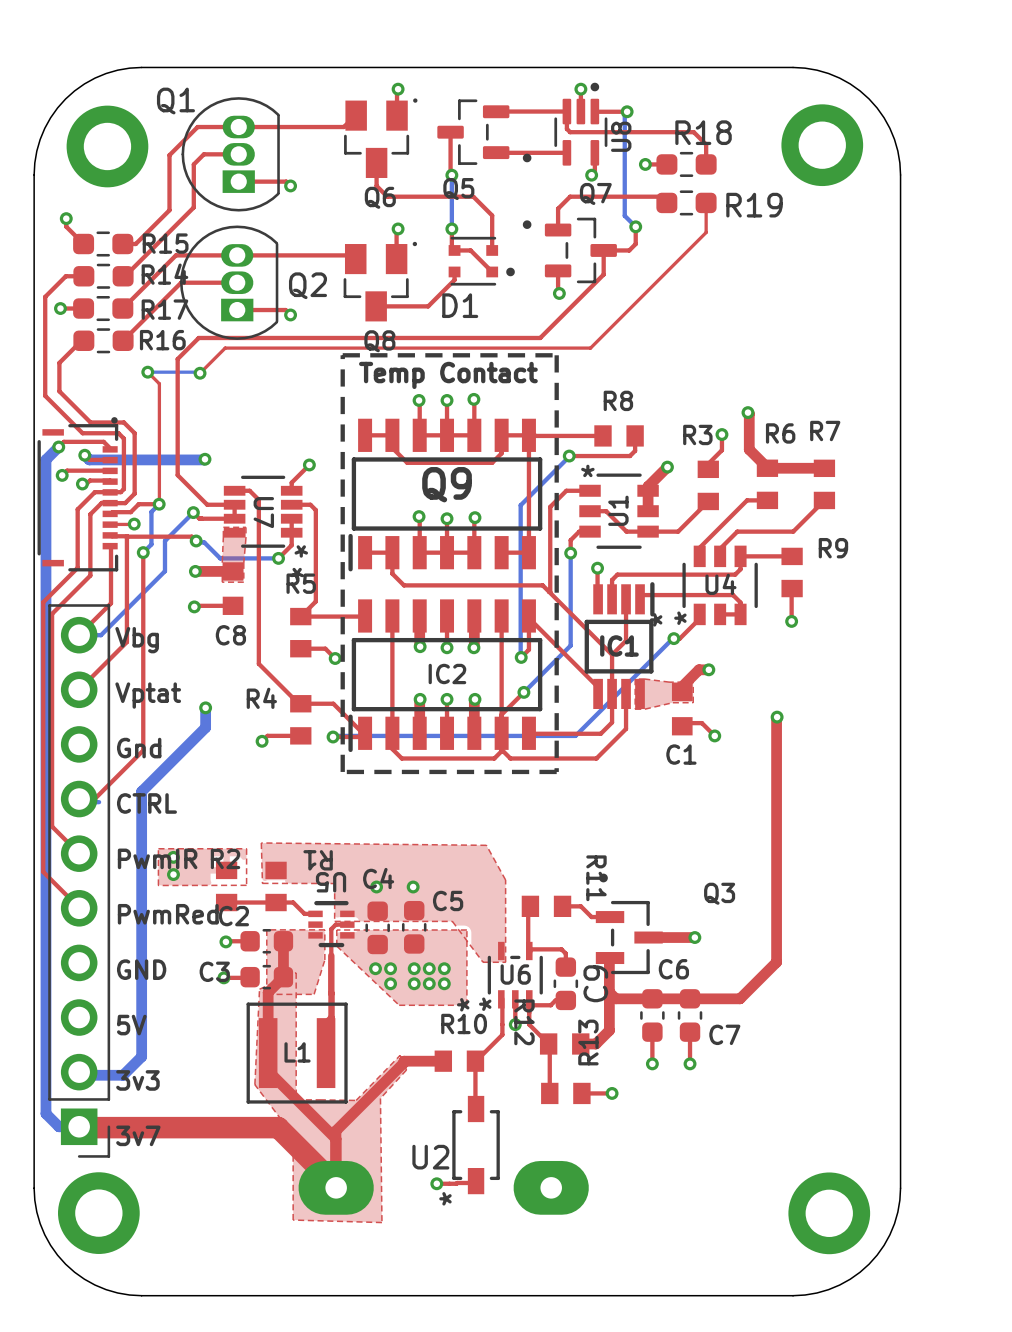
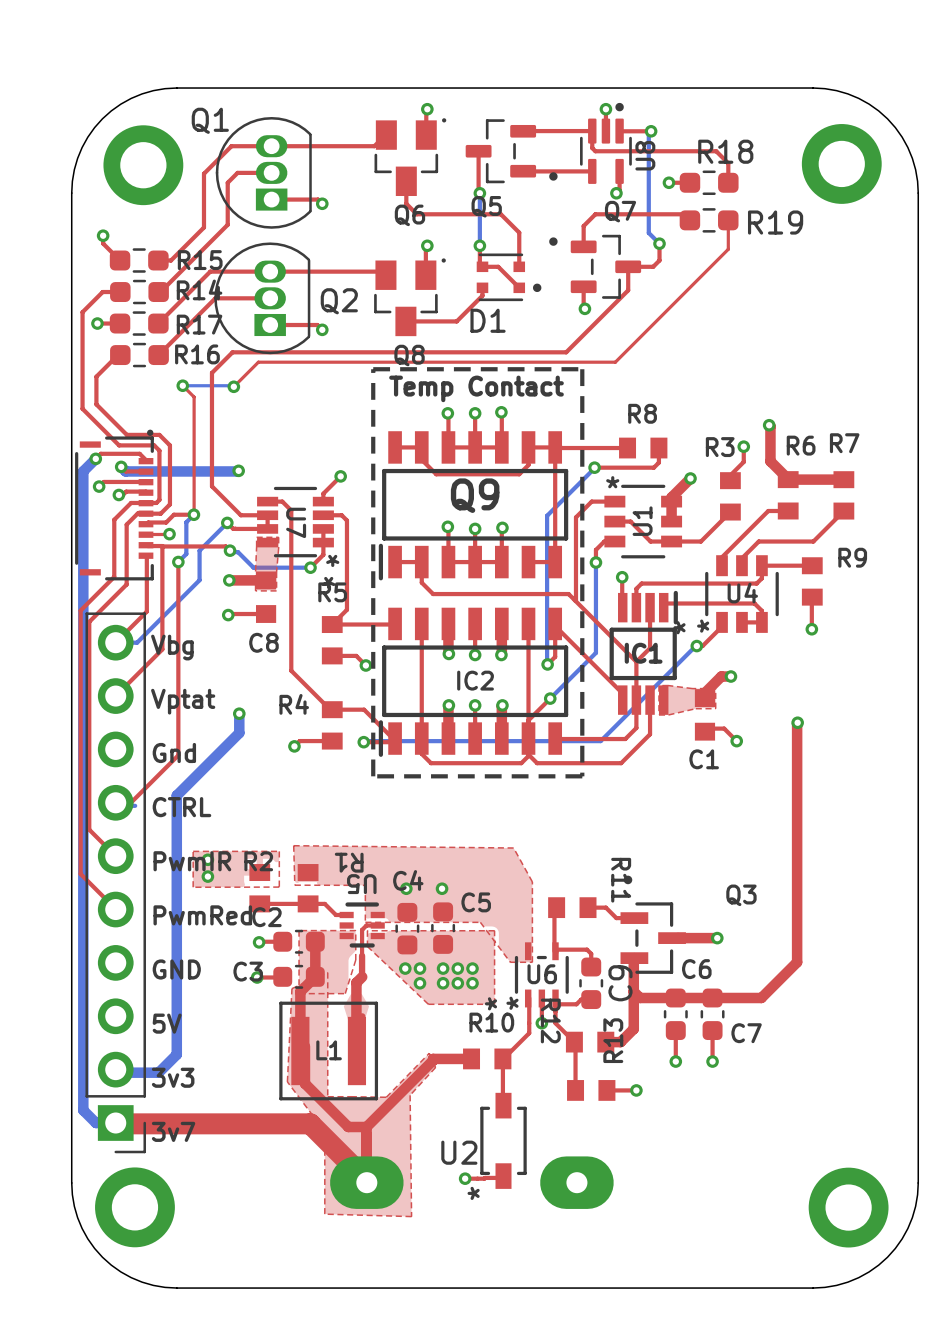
top track: (331, 977) (331, 993) -> (362, 976) (356, 982) (356, 1046)
top track: (331, 993) (331, 1017) -> none
top track: none -> (304, 1046) (304, 1083) (348, 1126) (366, 1126)
top track: (268, 1071) (335, 1138) -> none

